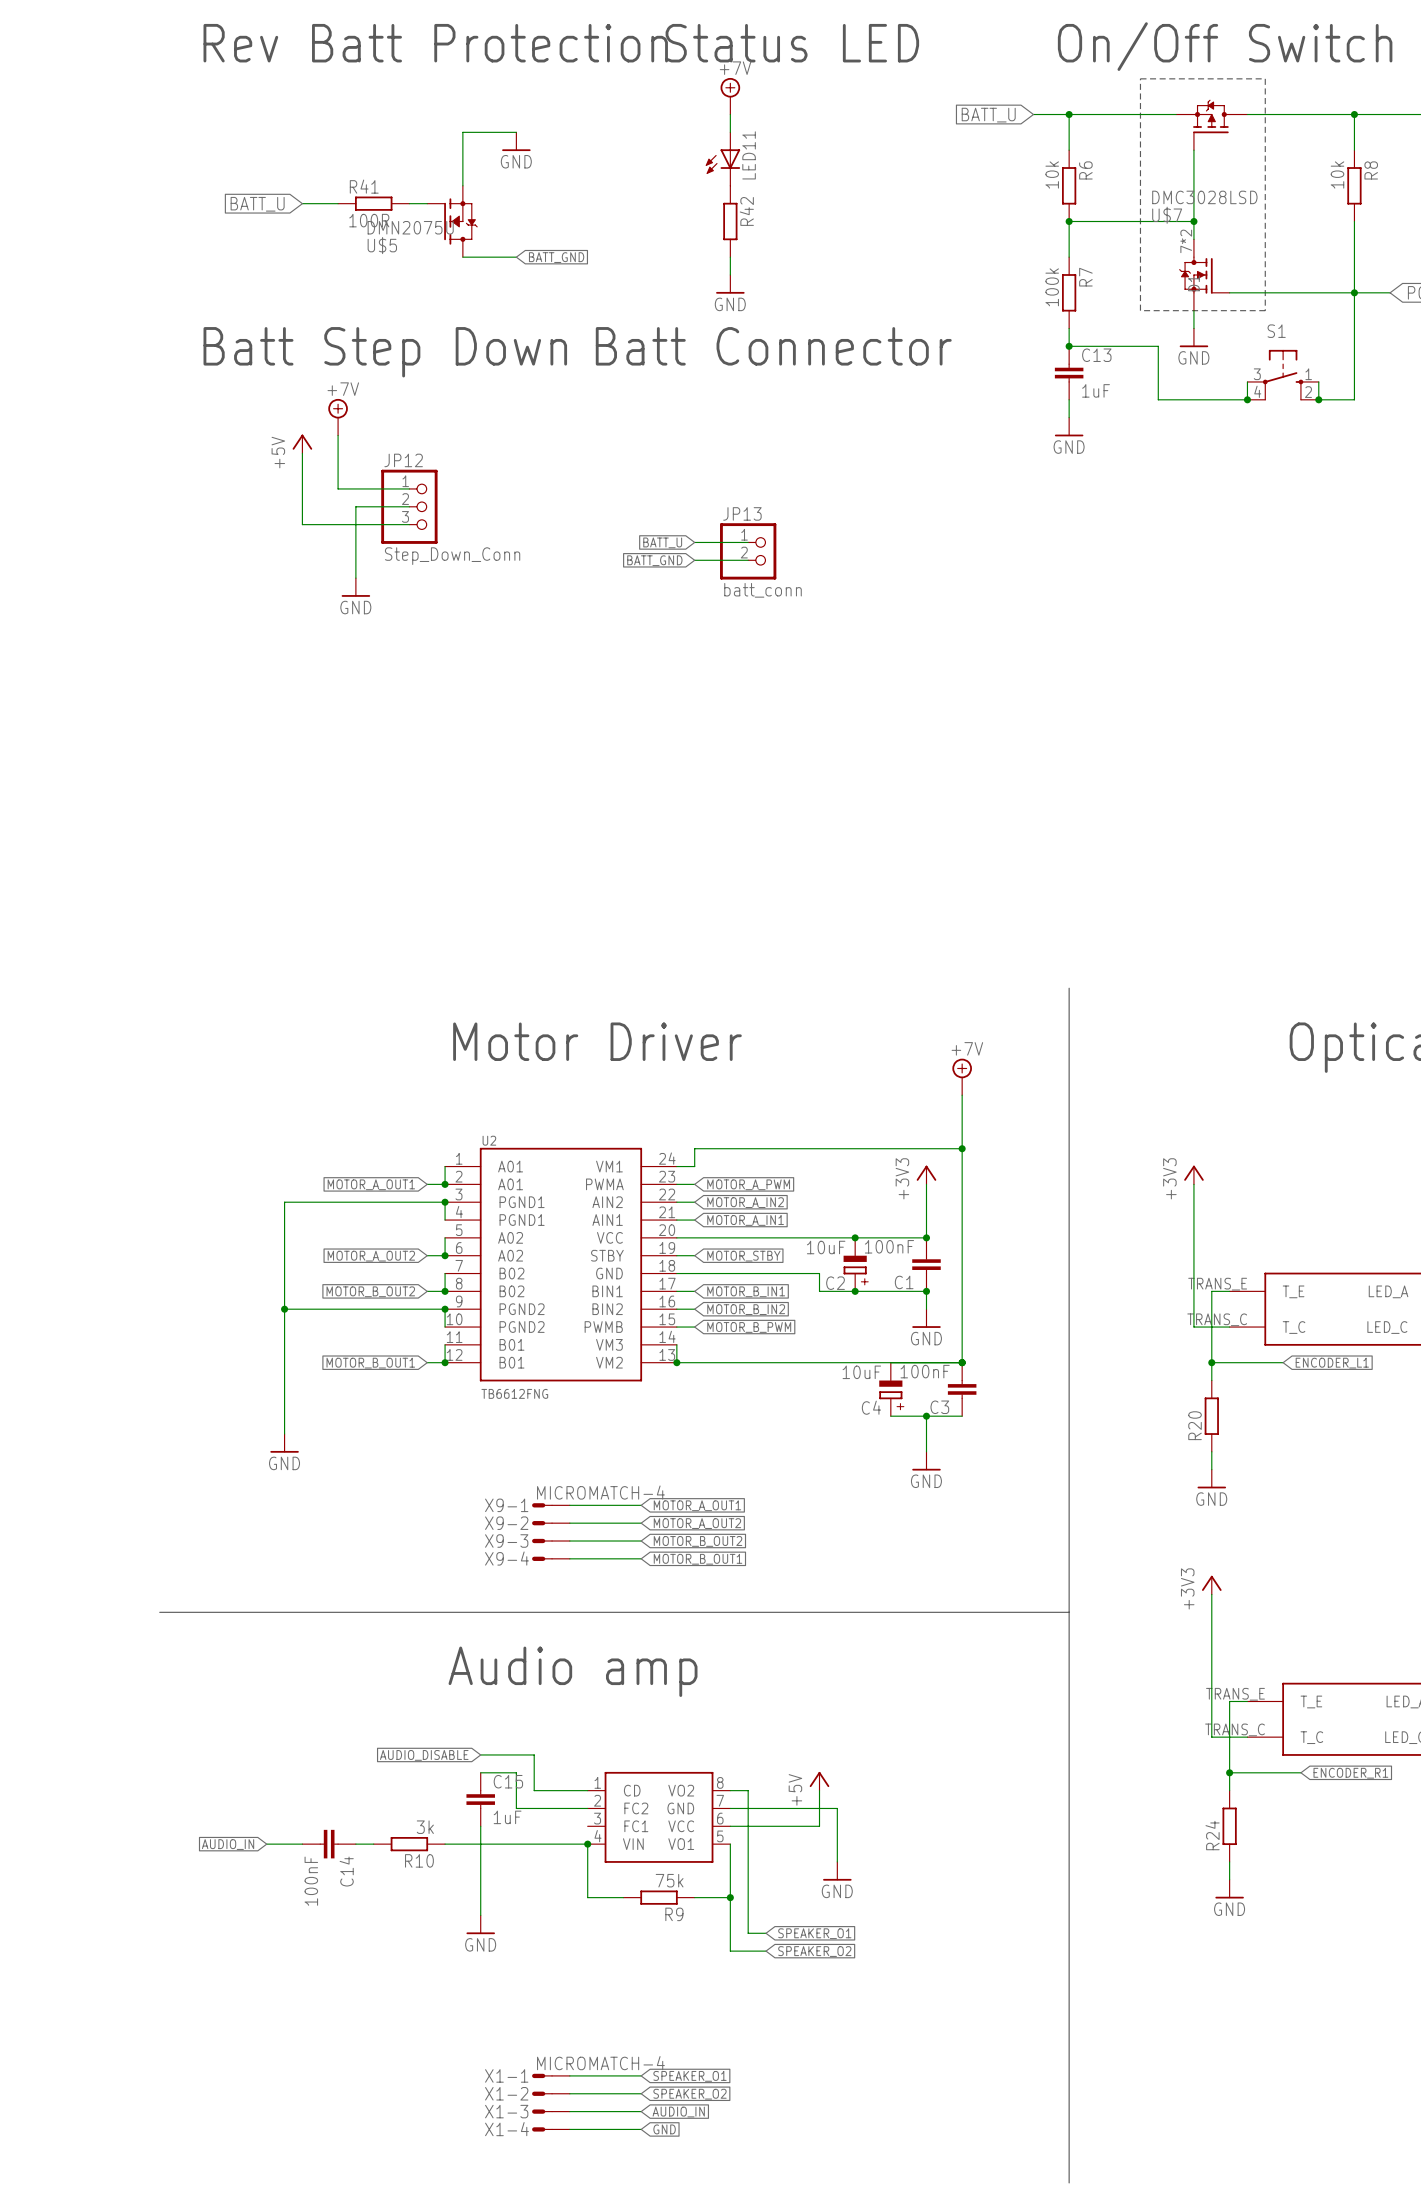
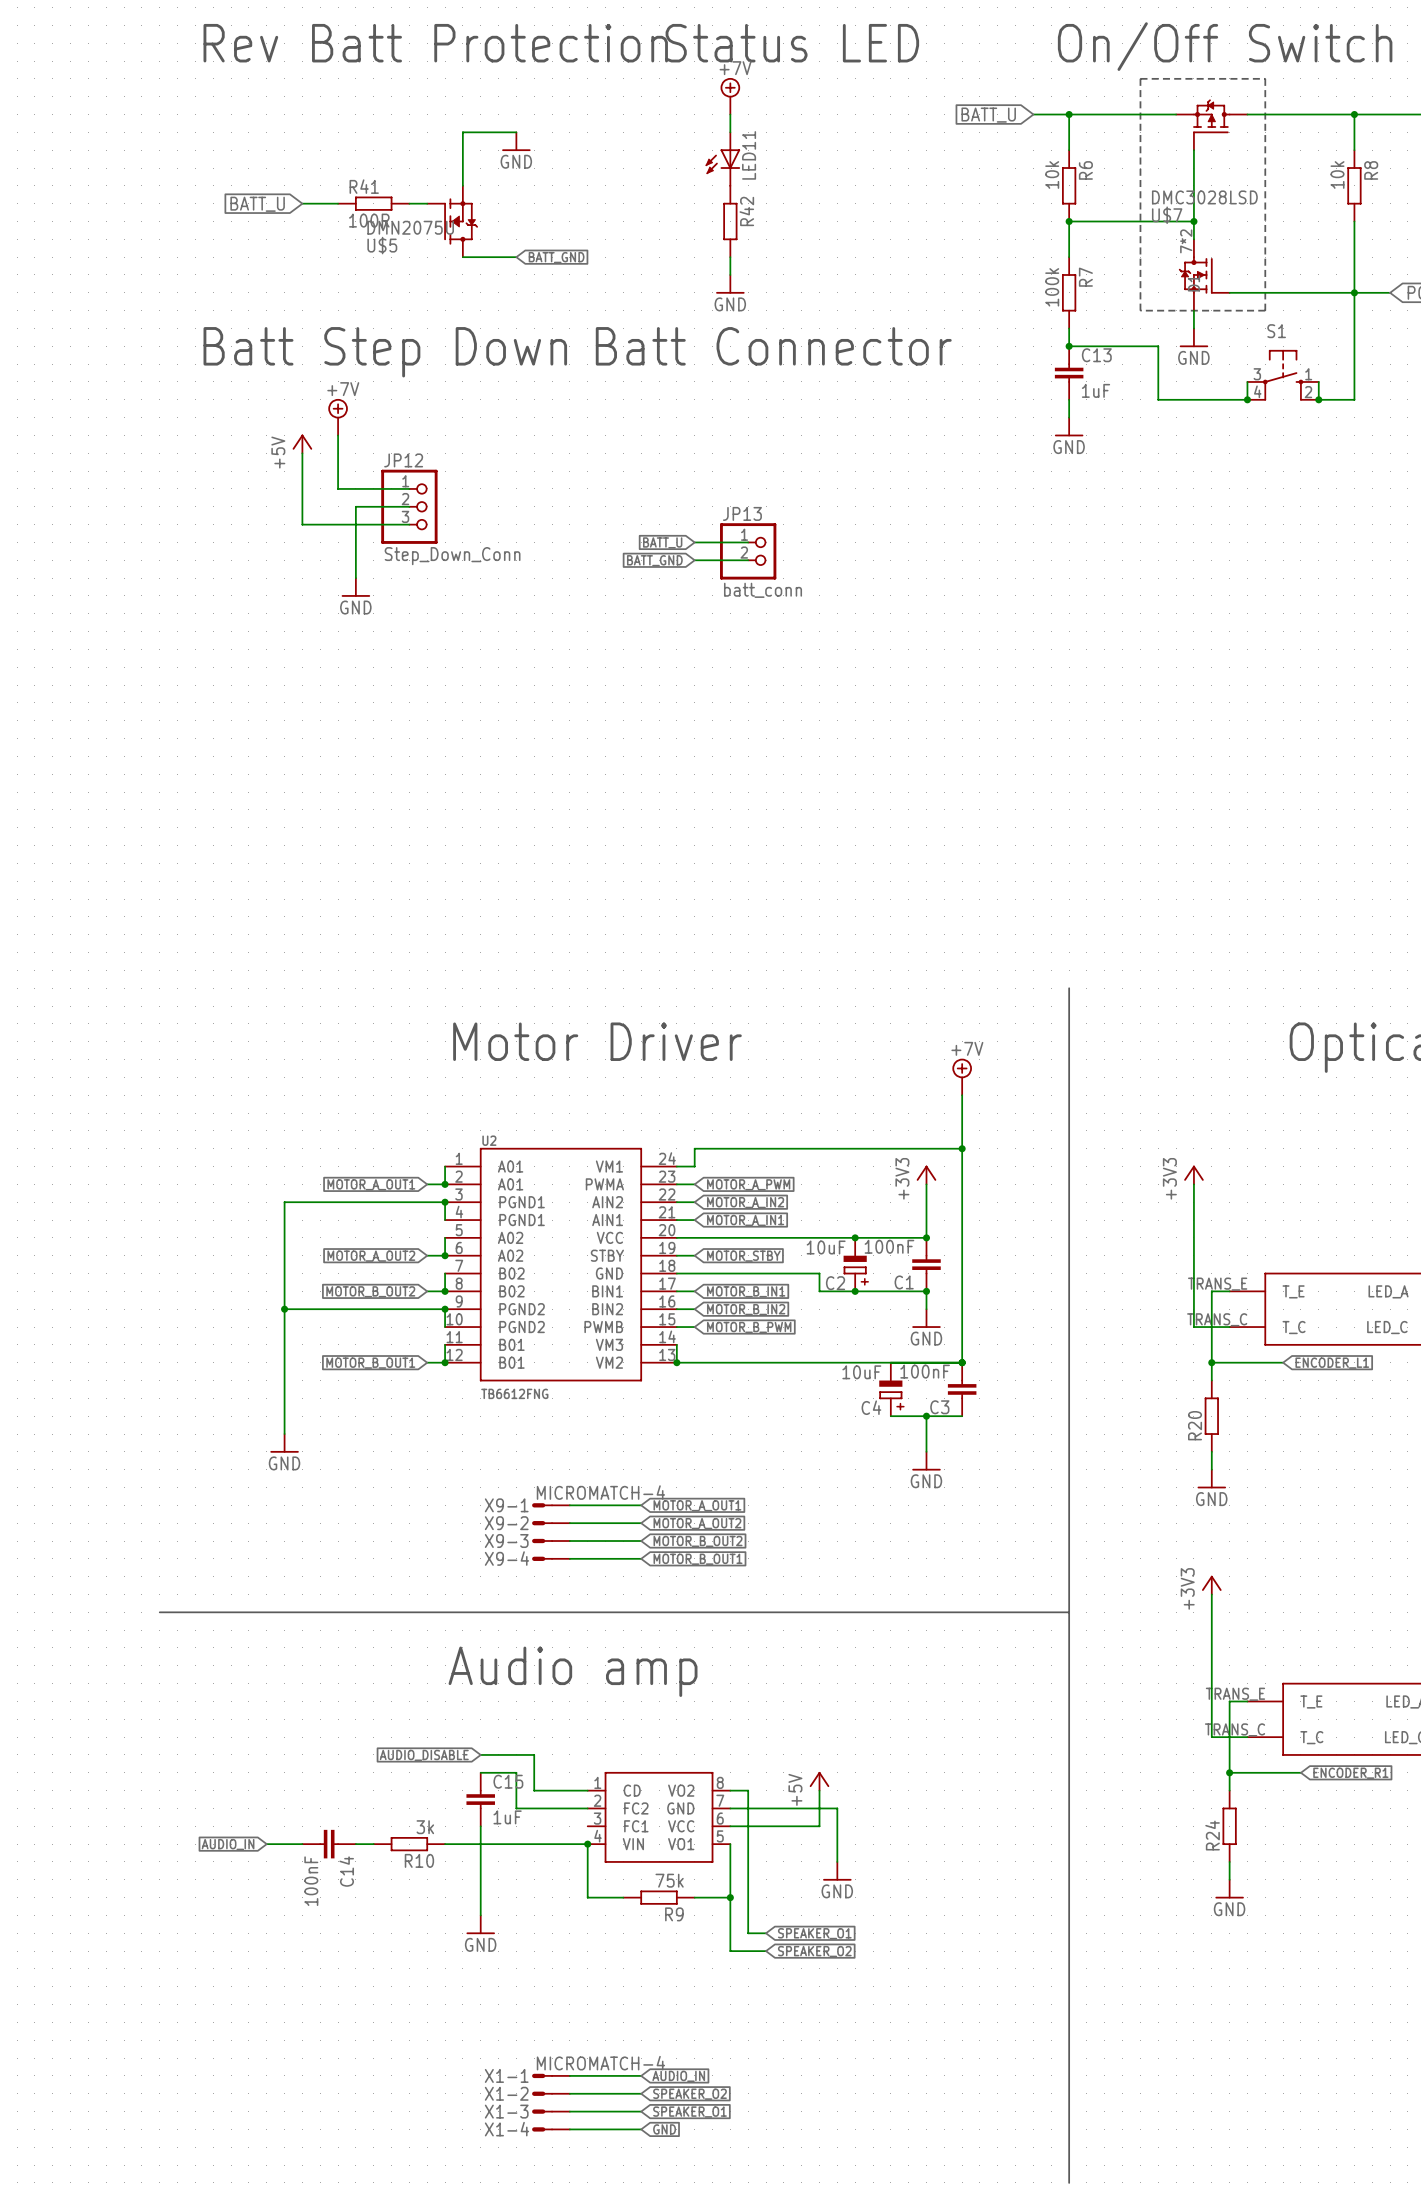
global label: SPEAKER_O1 (690, 2076) -> AUDIO_IN (678, 2076)
global label: AUDIO_IN (678, 2112) -> SPEAKER_O1 (690, 2112)

